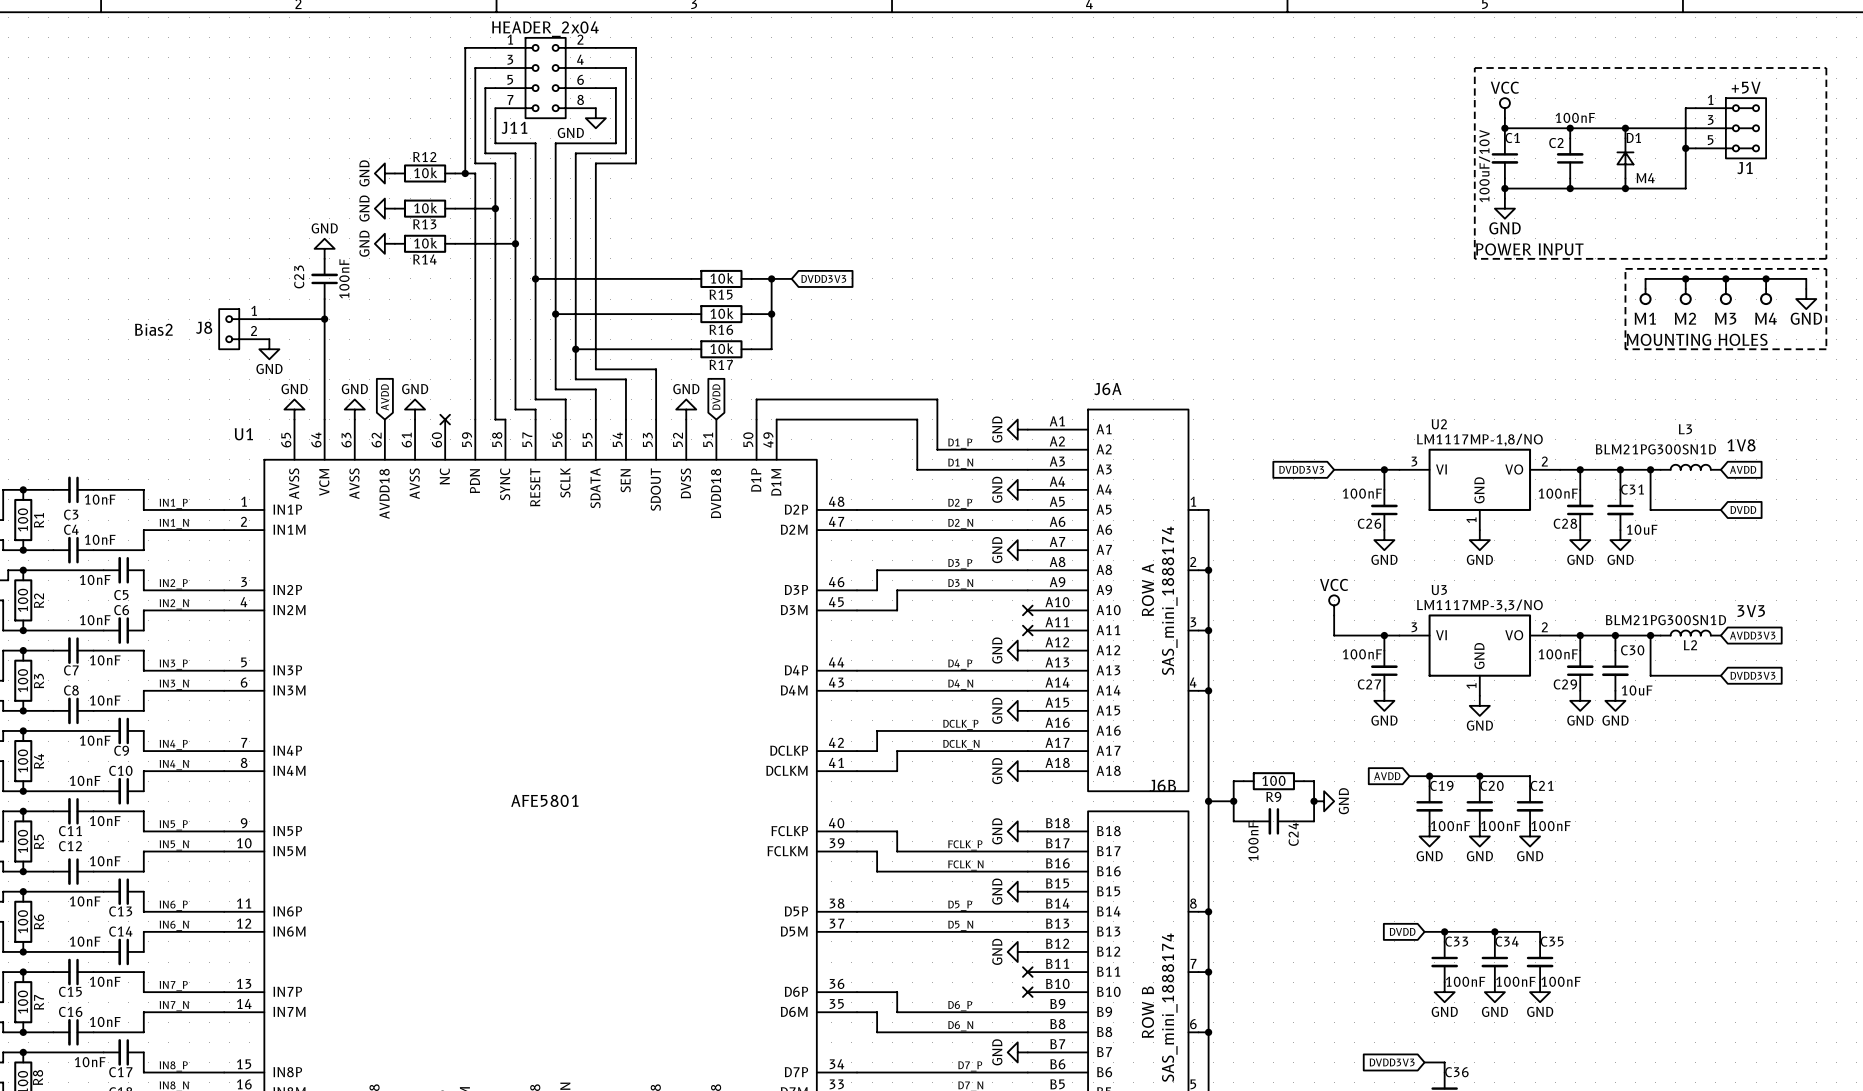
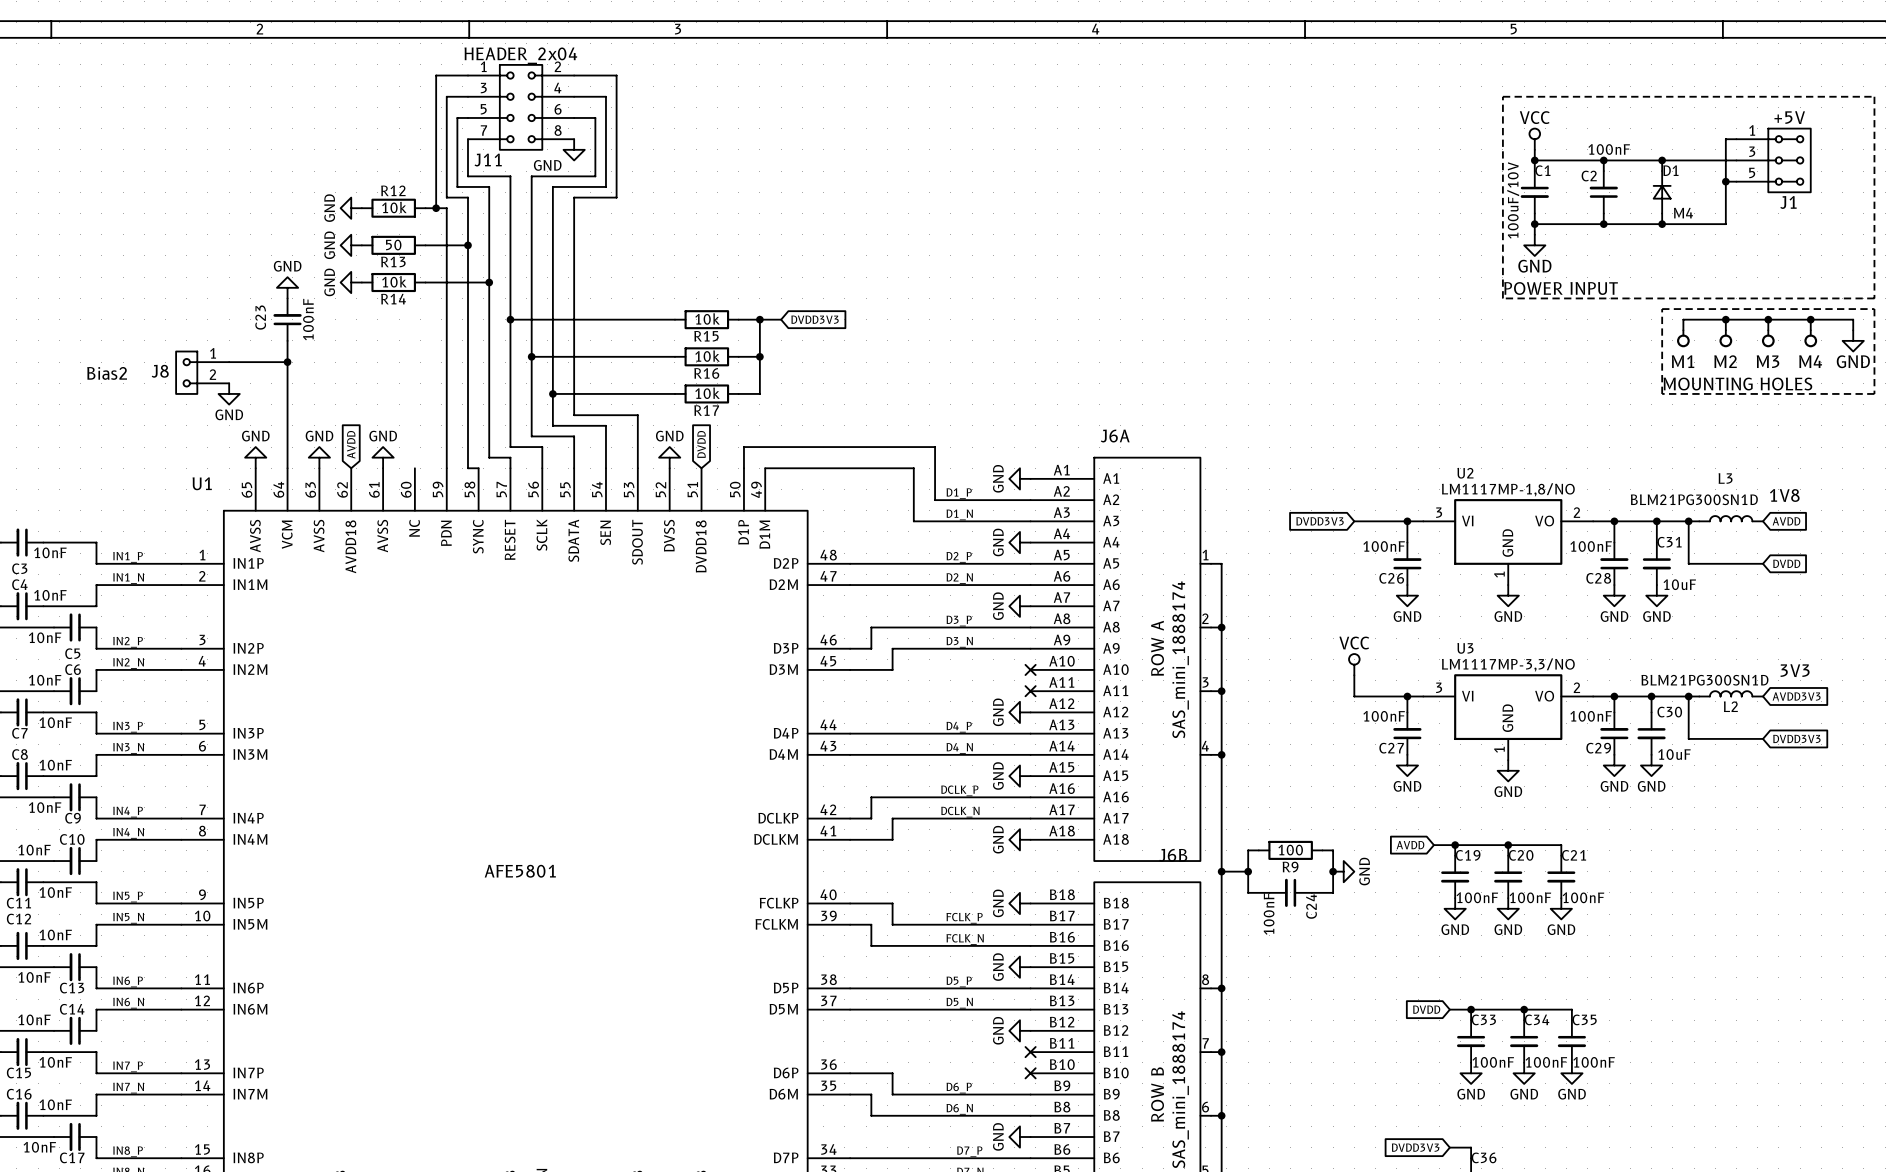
R13 value: 10k (425, 207) -> 50 (393, 245)
no-connect mark: (445, 419) -> none

